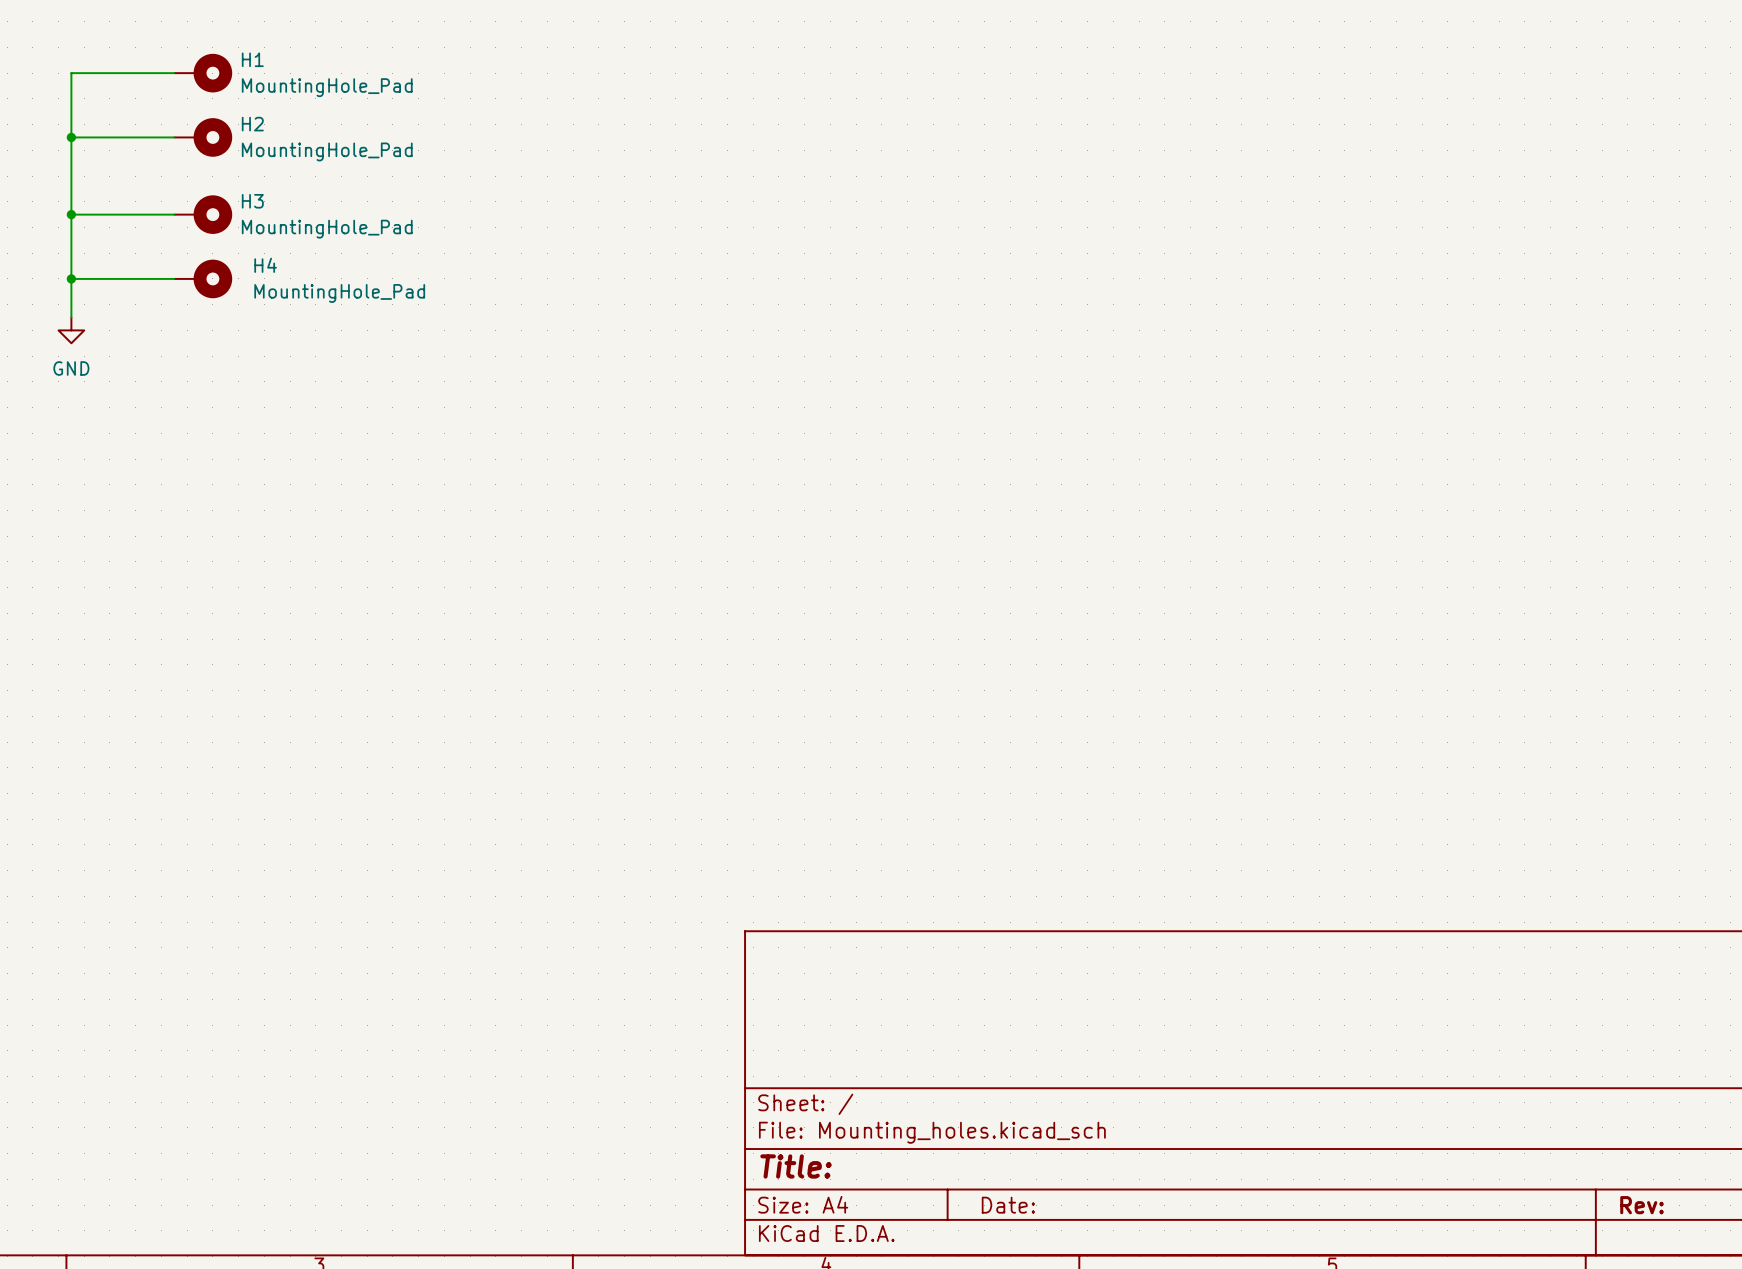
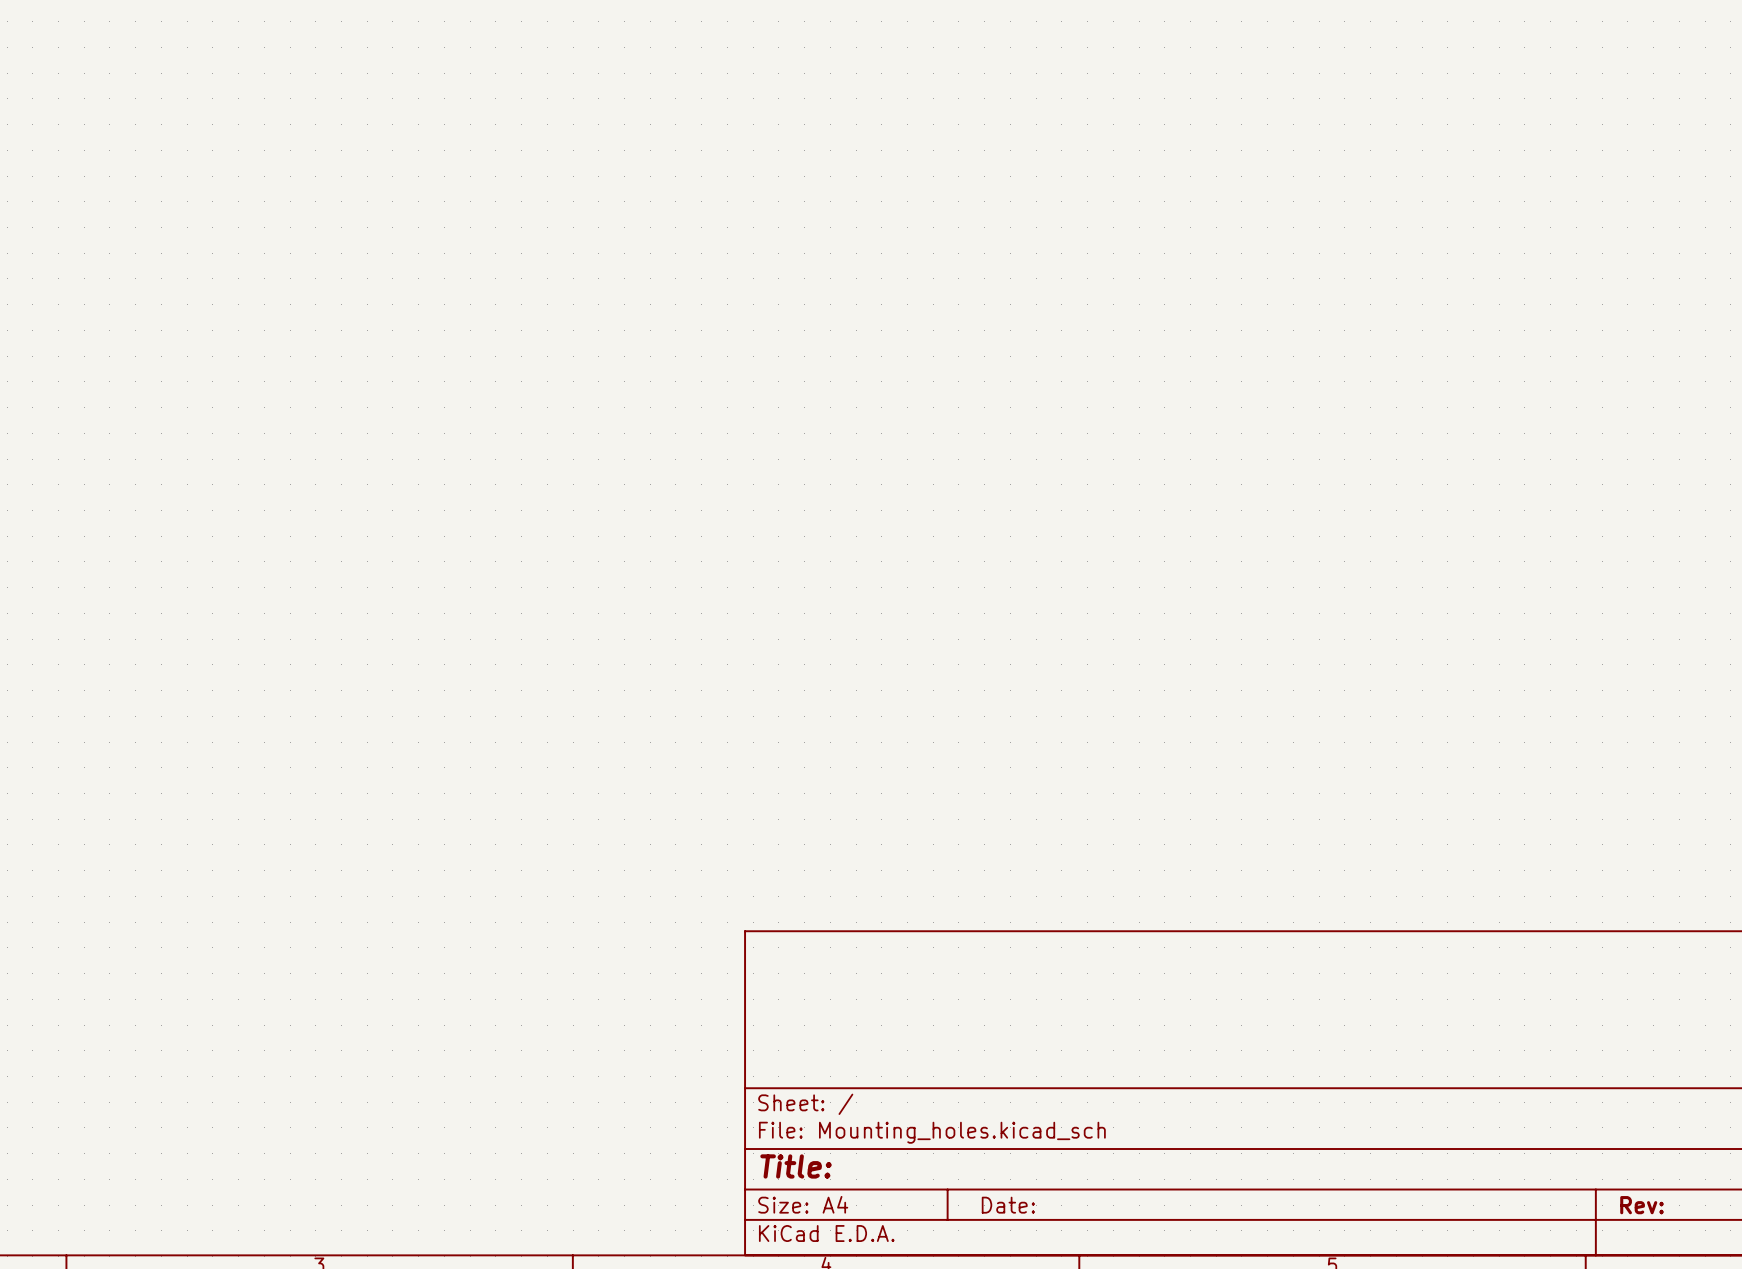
wire: (174, 73) (71, 73) (71, 317) -> none
H1: MountingHole_Pad (203, 73) -> none
wire: (71, 137) (174, 137) -> none
junction: (71, 137) -> none
H2: MountingHole_Pad (203, 137) -> none
wire: (71, 214) (174, 214) -> none
junction: (71, 214) -> none
H3: MountingHole_Pad (203, 214) -> none
wire: (71, 278) (174, 278) -> none
junction: (71, 278) -> none
H4: MountingHole_Pad (203, 278) -> none
power symbol: GND (71, 330) -> none

